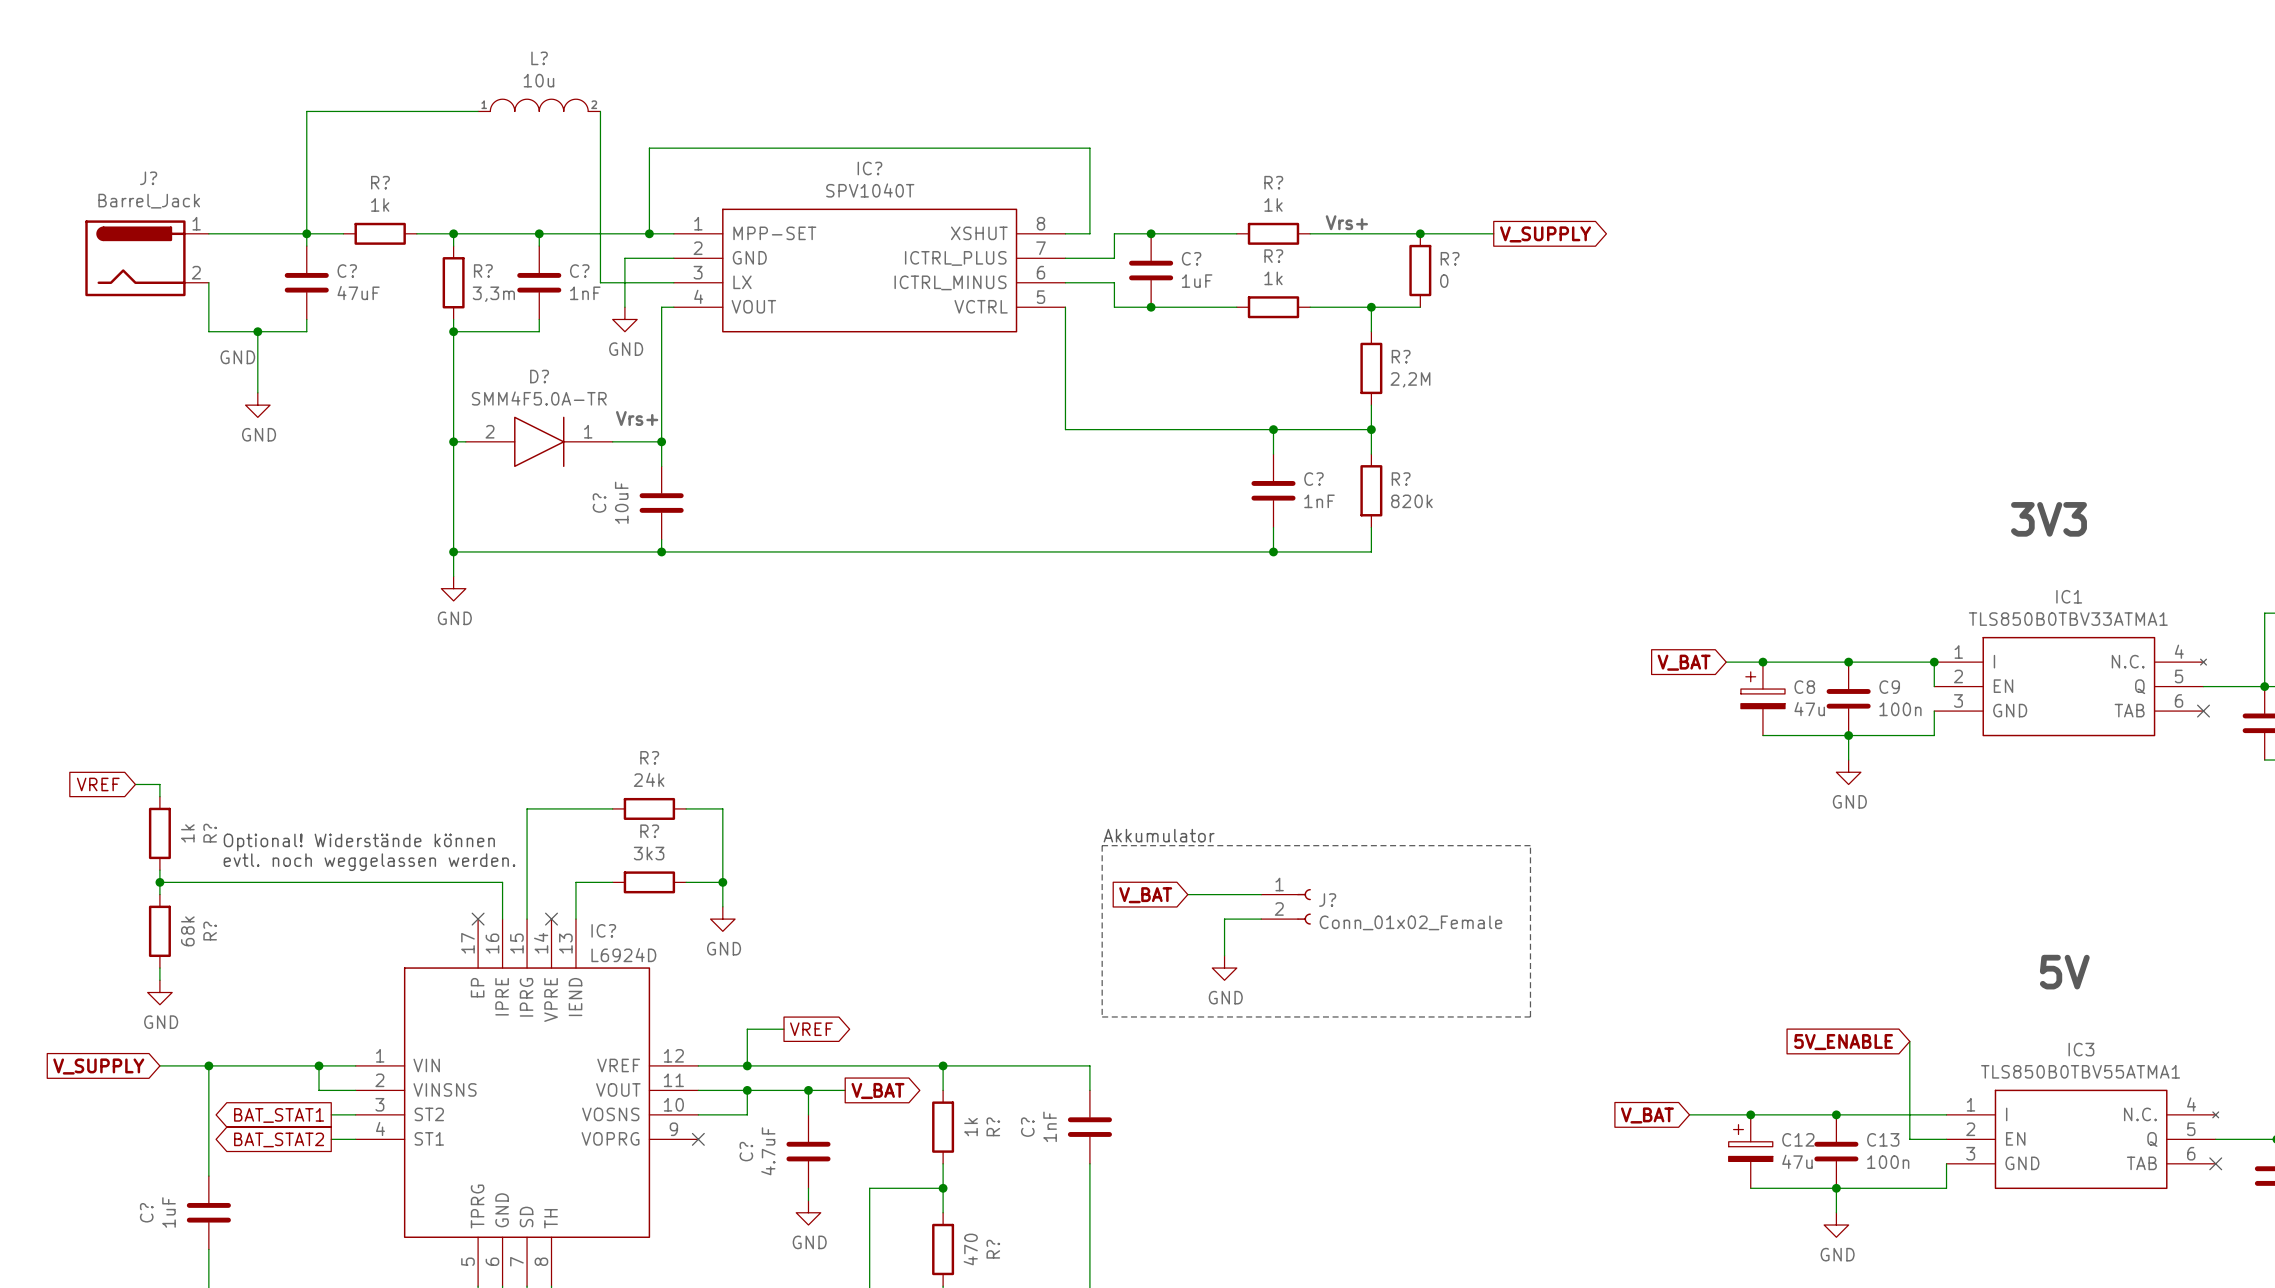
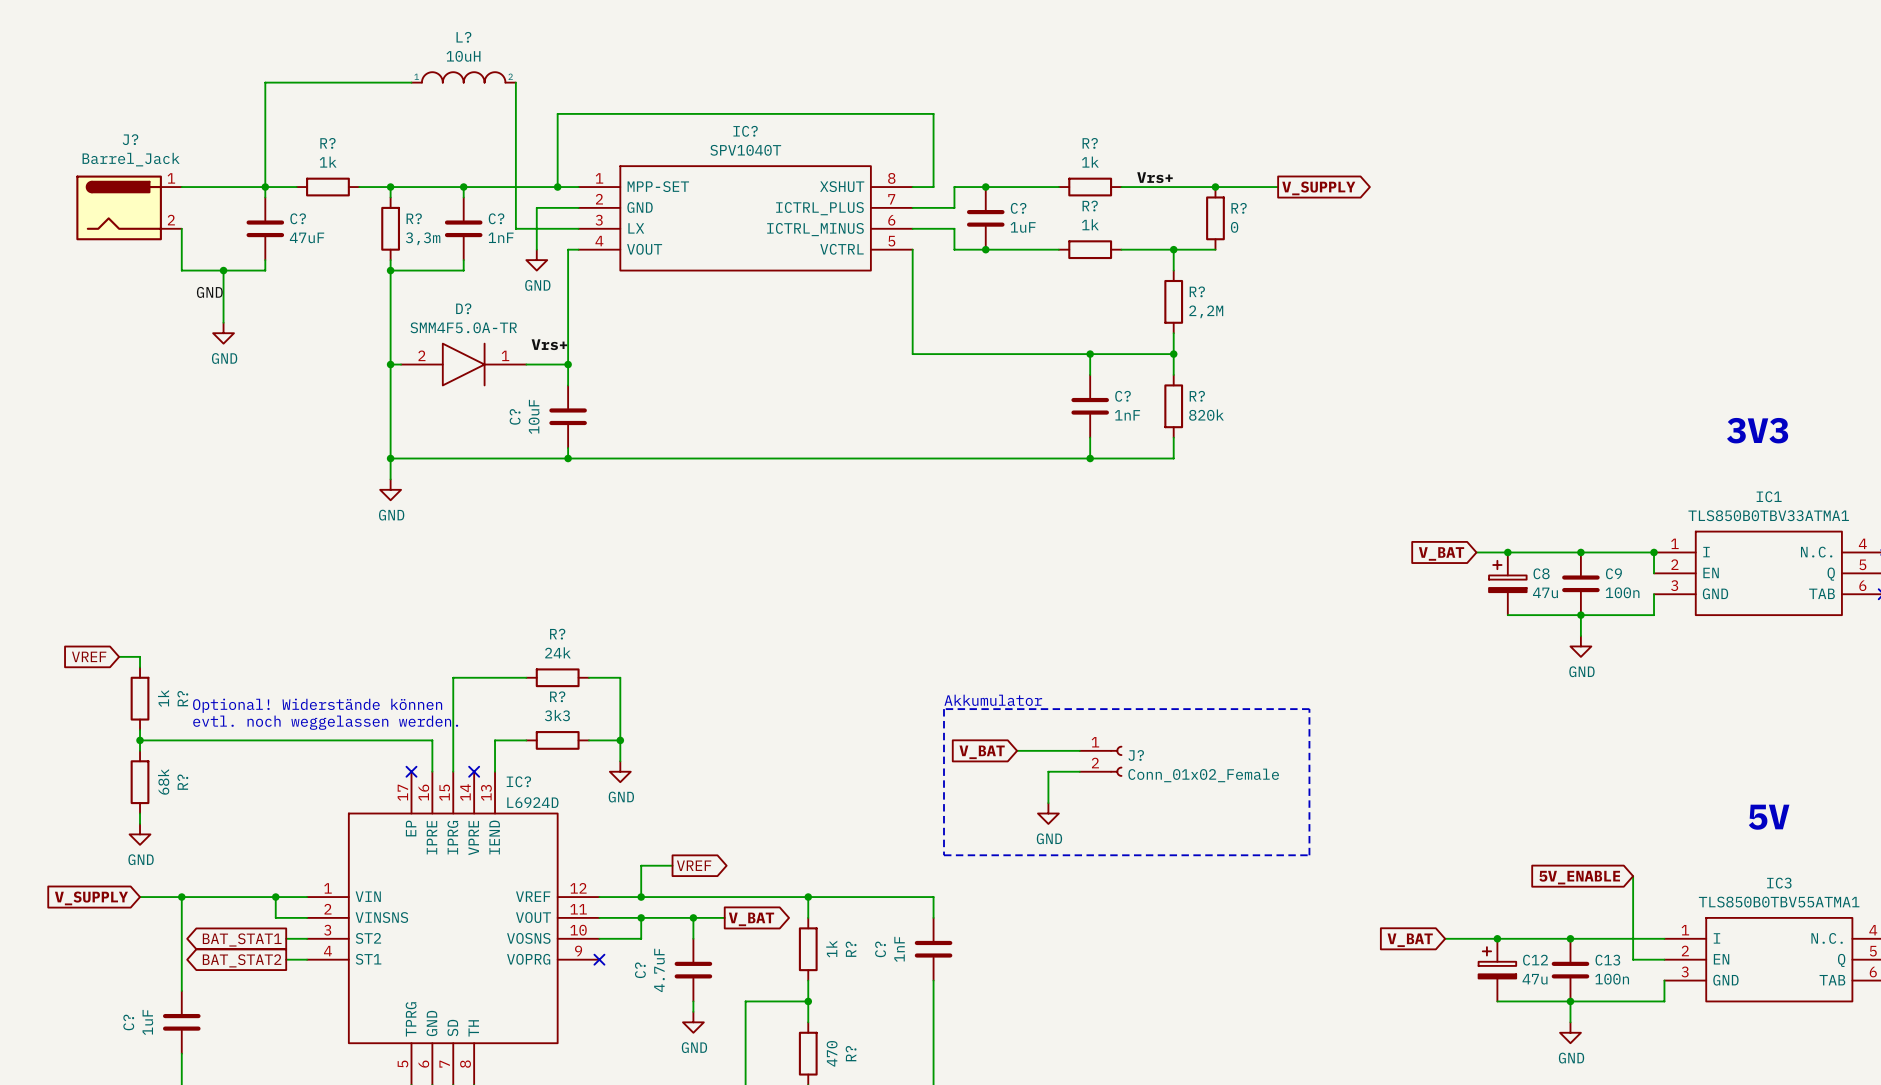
L? value: 10u (538, 80) -> 10uH (463, 56)

